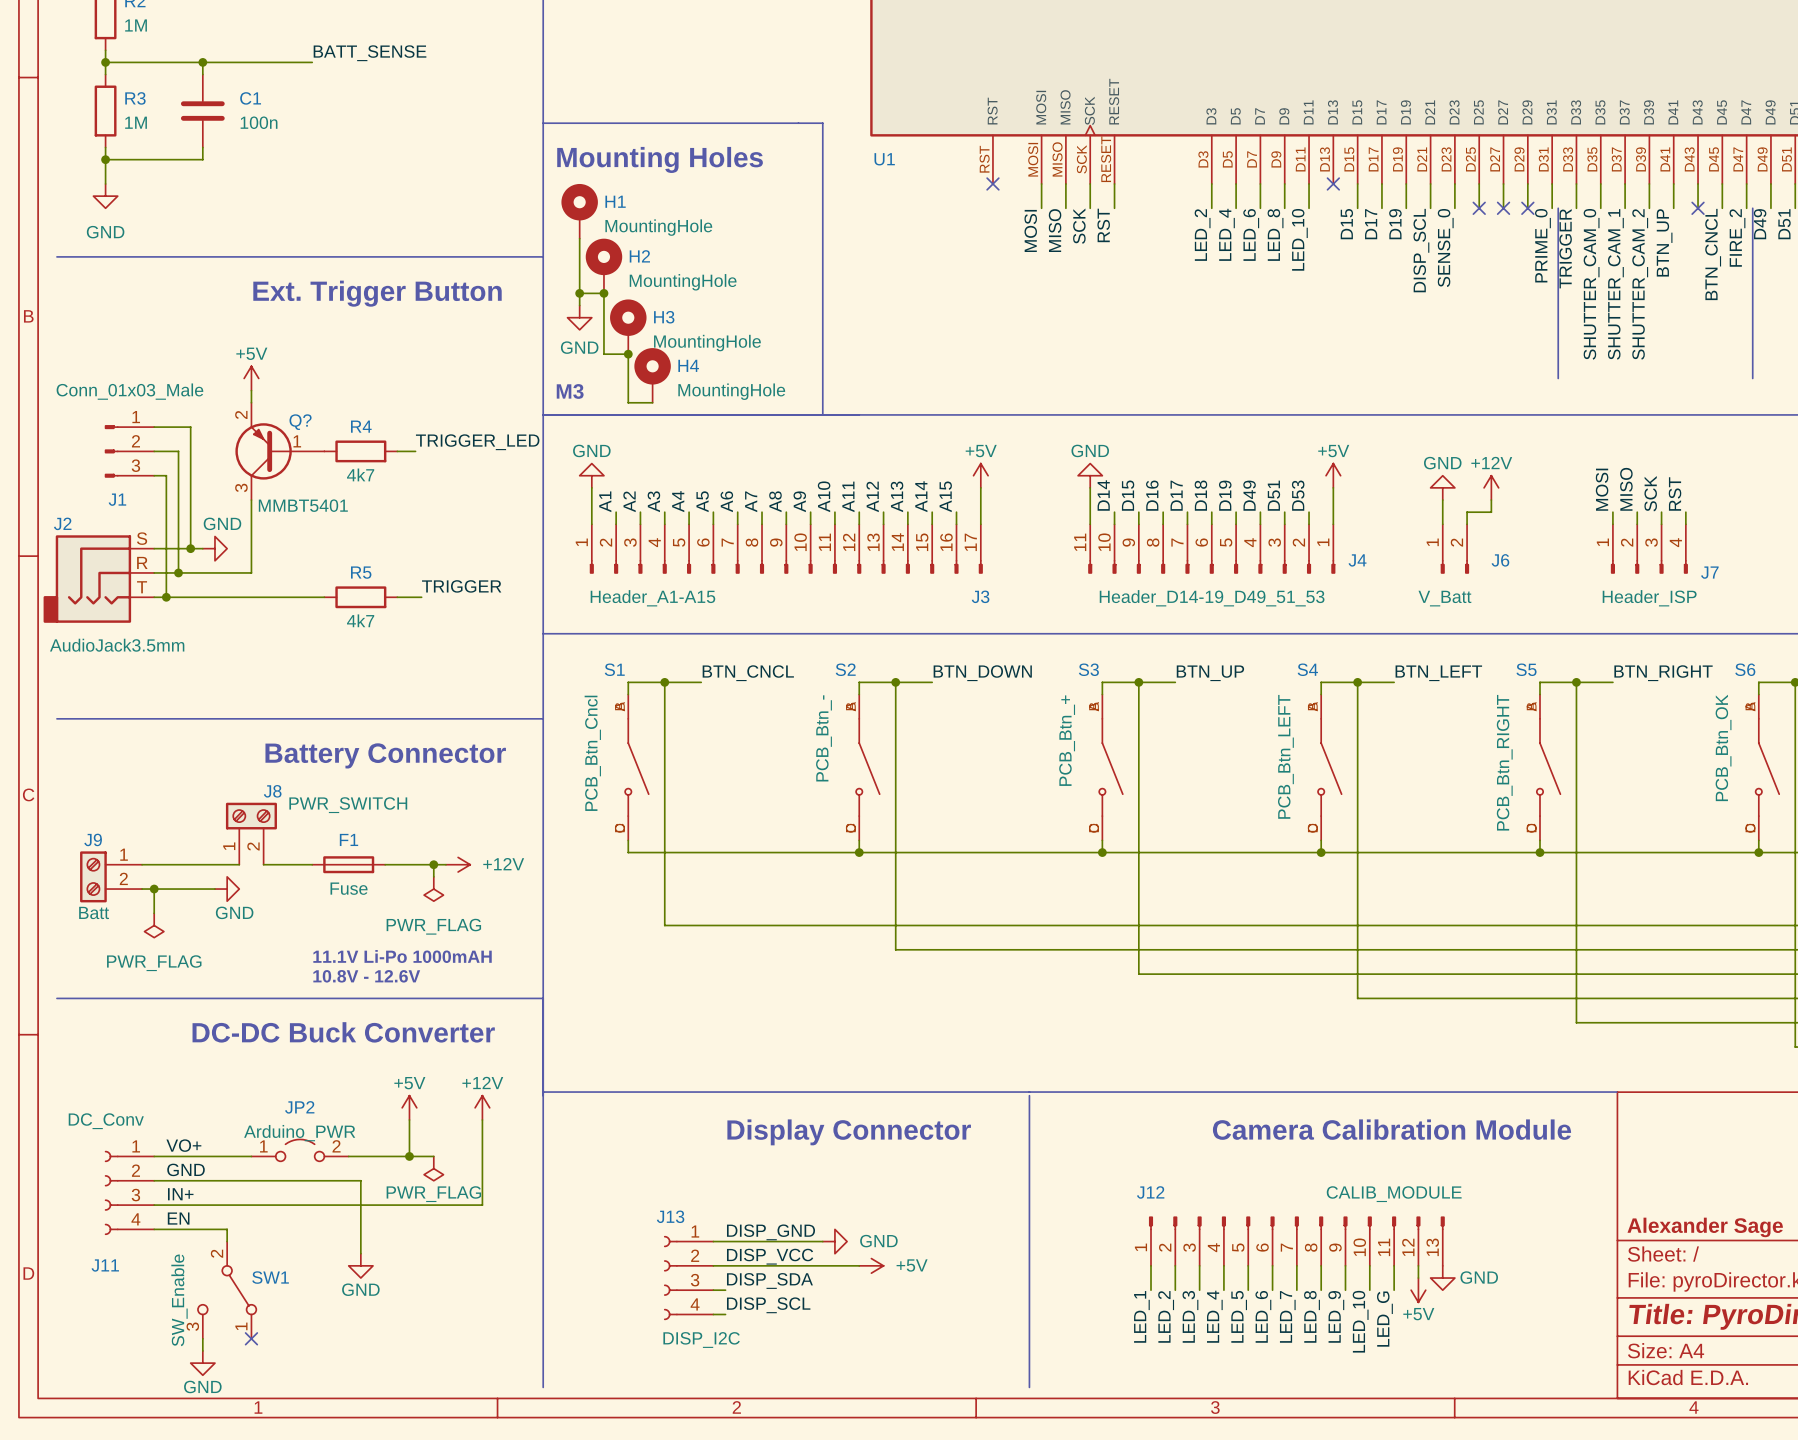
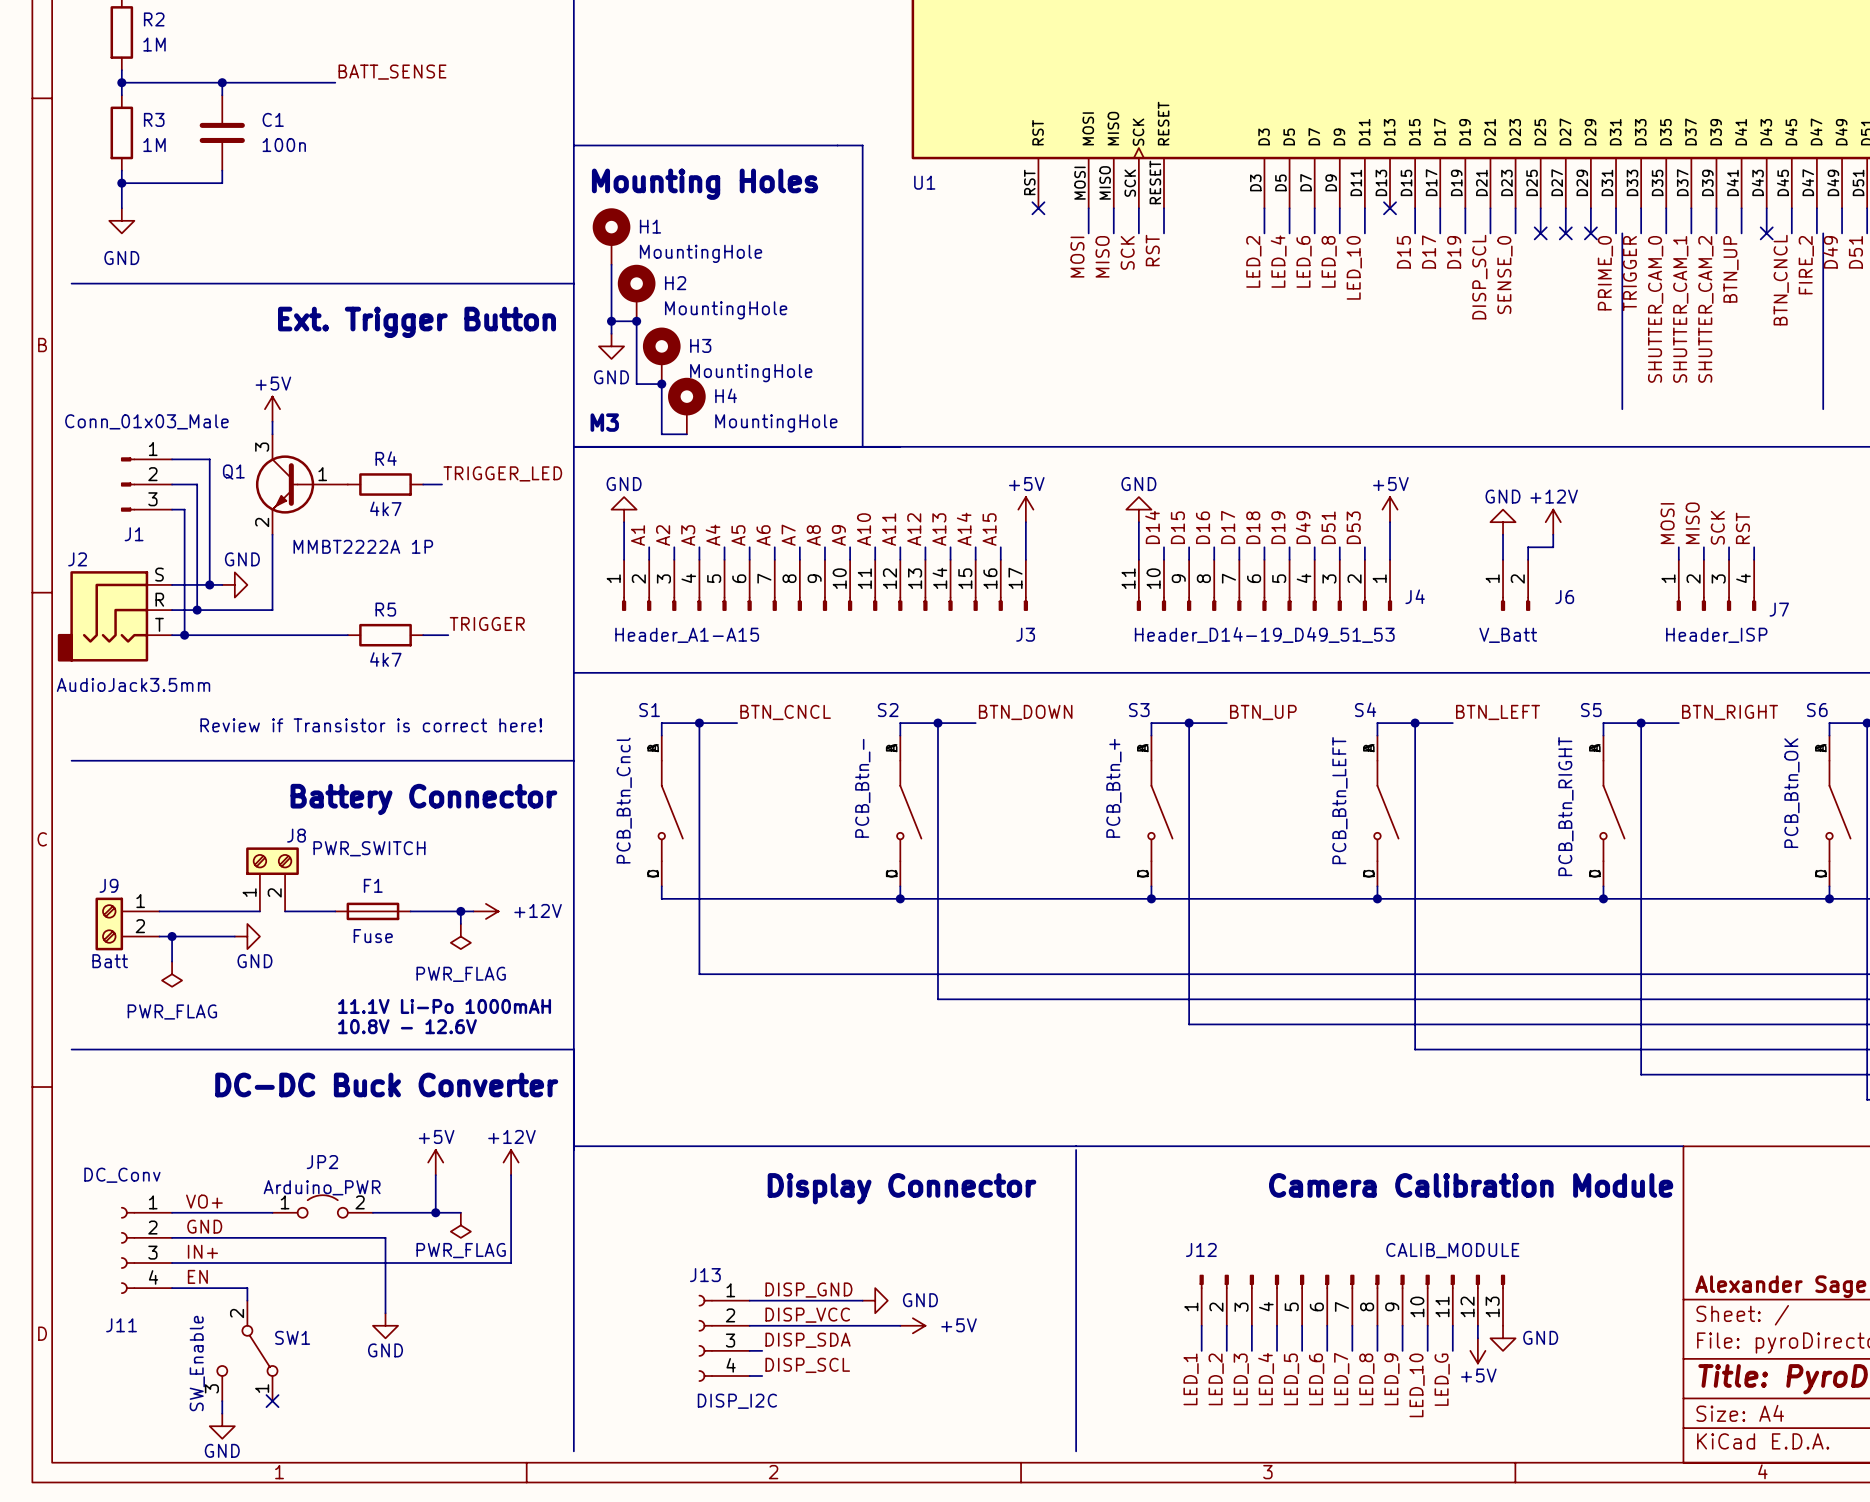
Q?: MMBT5401 (279, 451) -> none
Q1: none -> MMBT2222A 1P (301, 484)
text: none -> Review if Transistor is correct here! (371, 725)

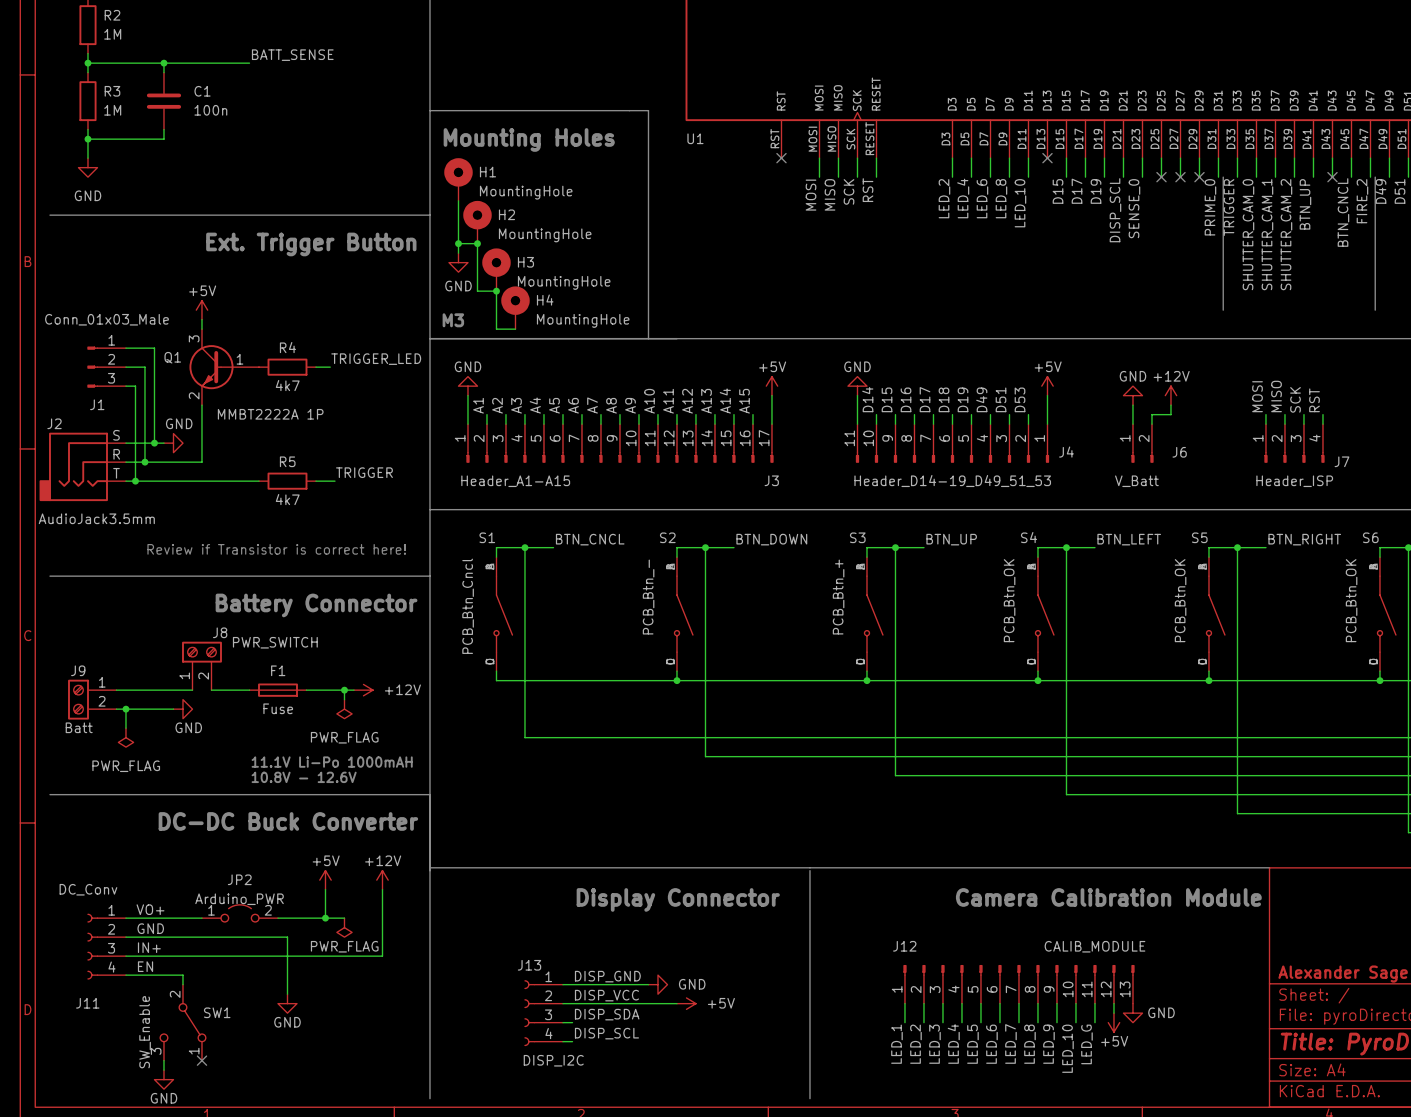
S4 value: PCB_Btn_LEFT (1339, 800) -> PCB_Btn_OK (1009, 600)
S5 value: PCB_Btn_RIGHT (1565, 806) -> PCB_Btn_OK (1180, 600)

